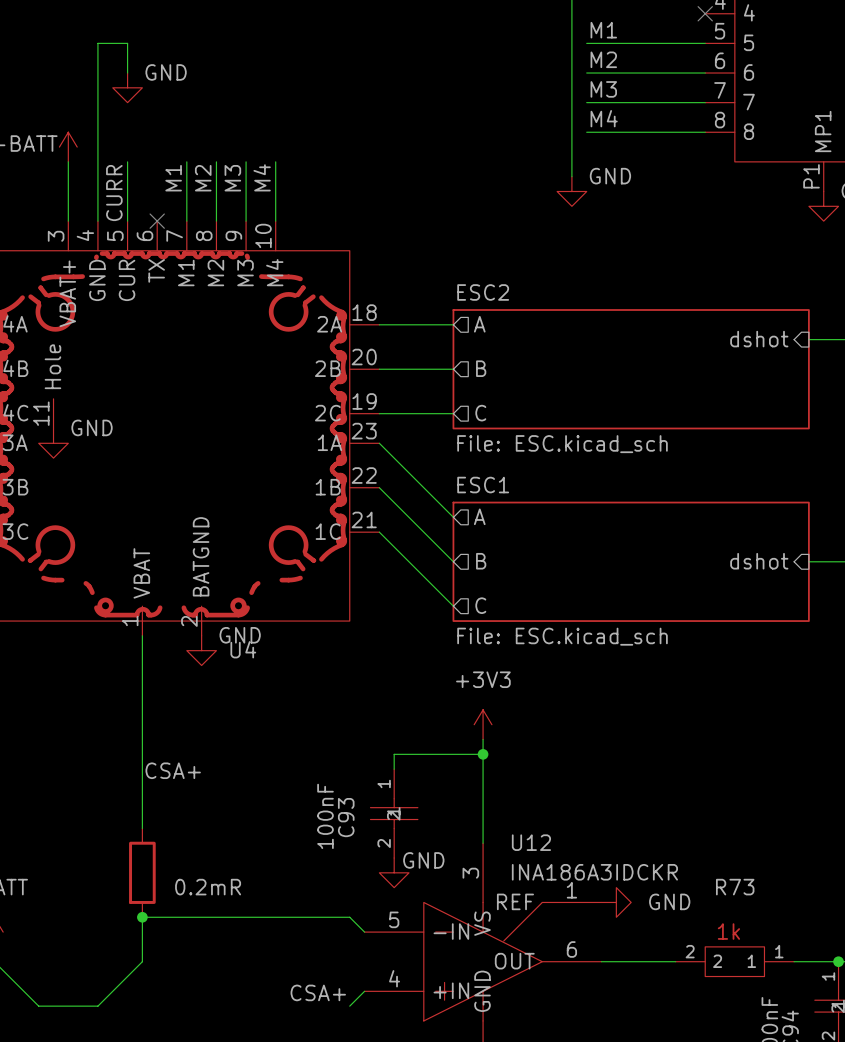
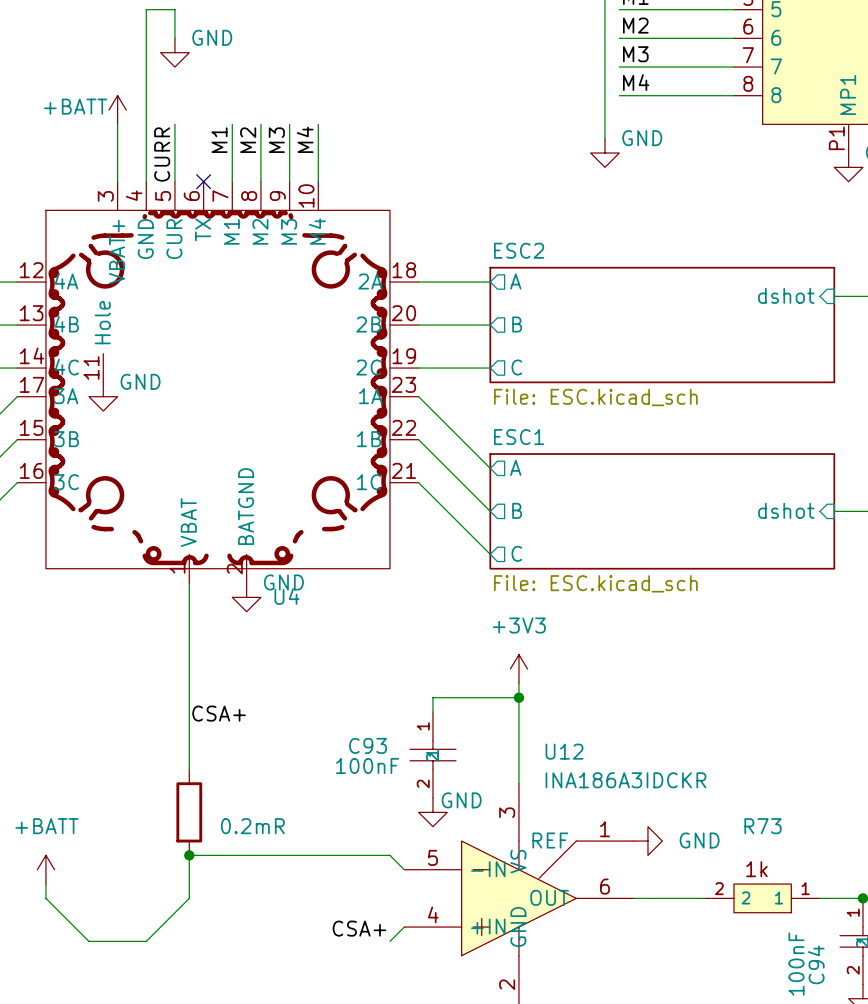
C93 value rotation: 0° (325, 816) -> 90° clockwise (367, 765)
C93 name rotation: 0° (346, 817) -> 90° clockwise (368, 745)
U12 name position: U12 (531, 842) -> U12 (564, 751)
U12 value position: INA186A3IDCKR (594, 872) -> INA186A3IDCKR (625, 780)

